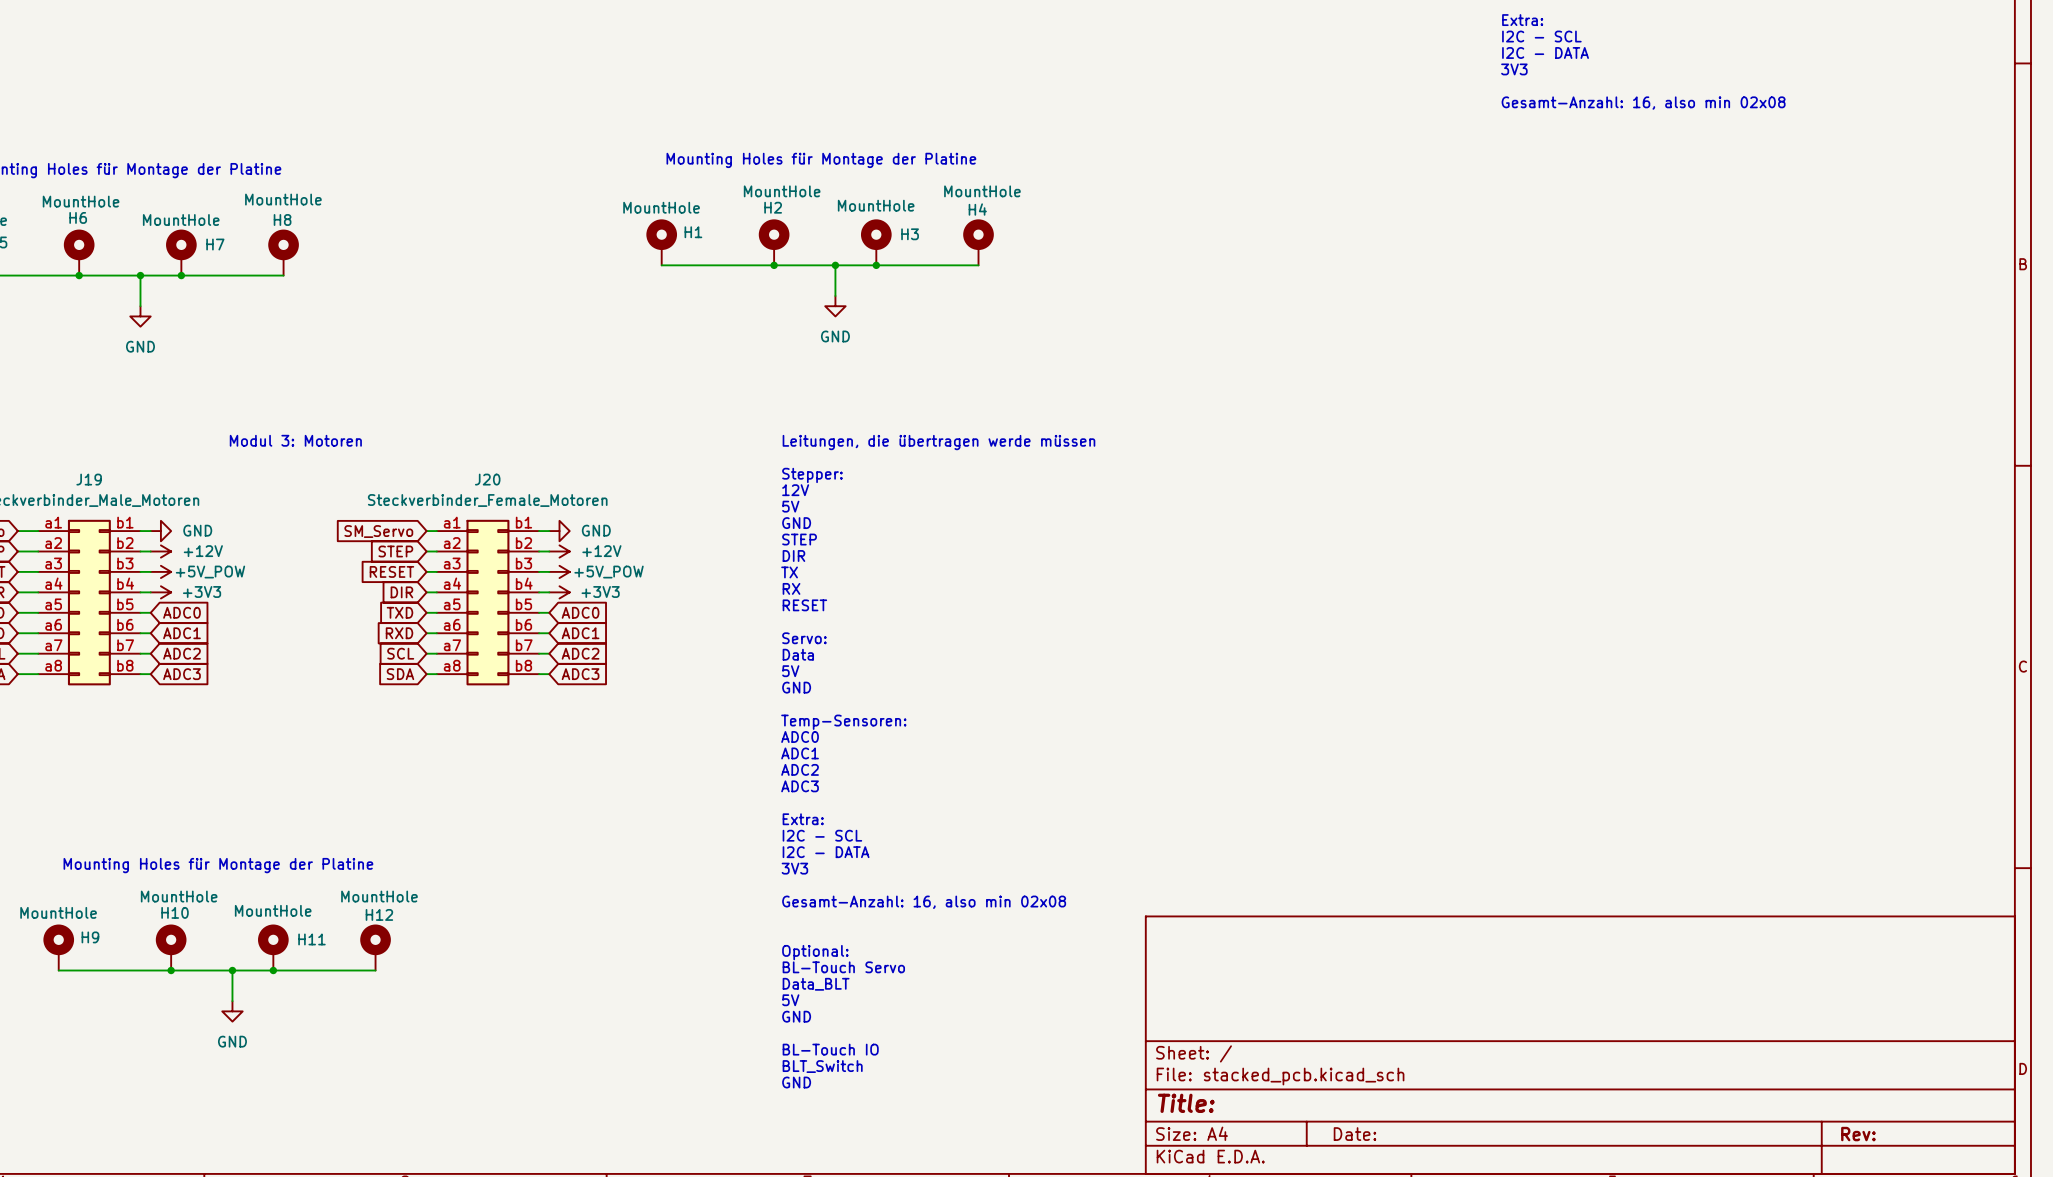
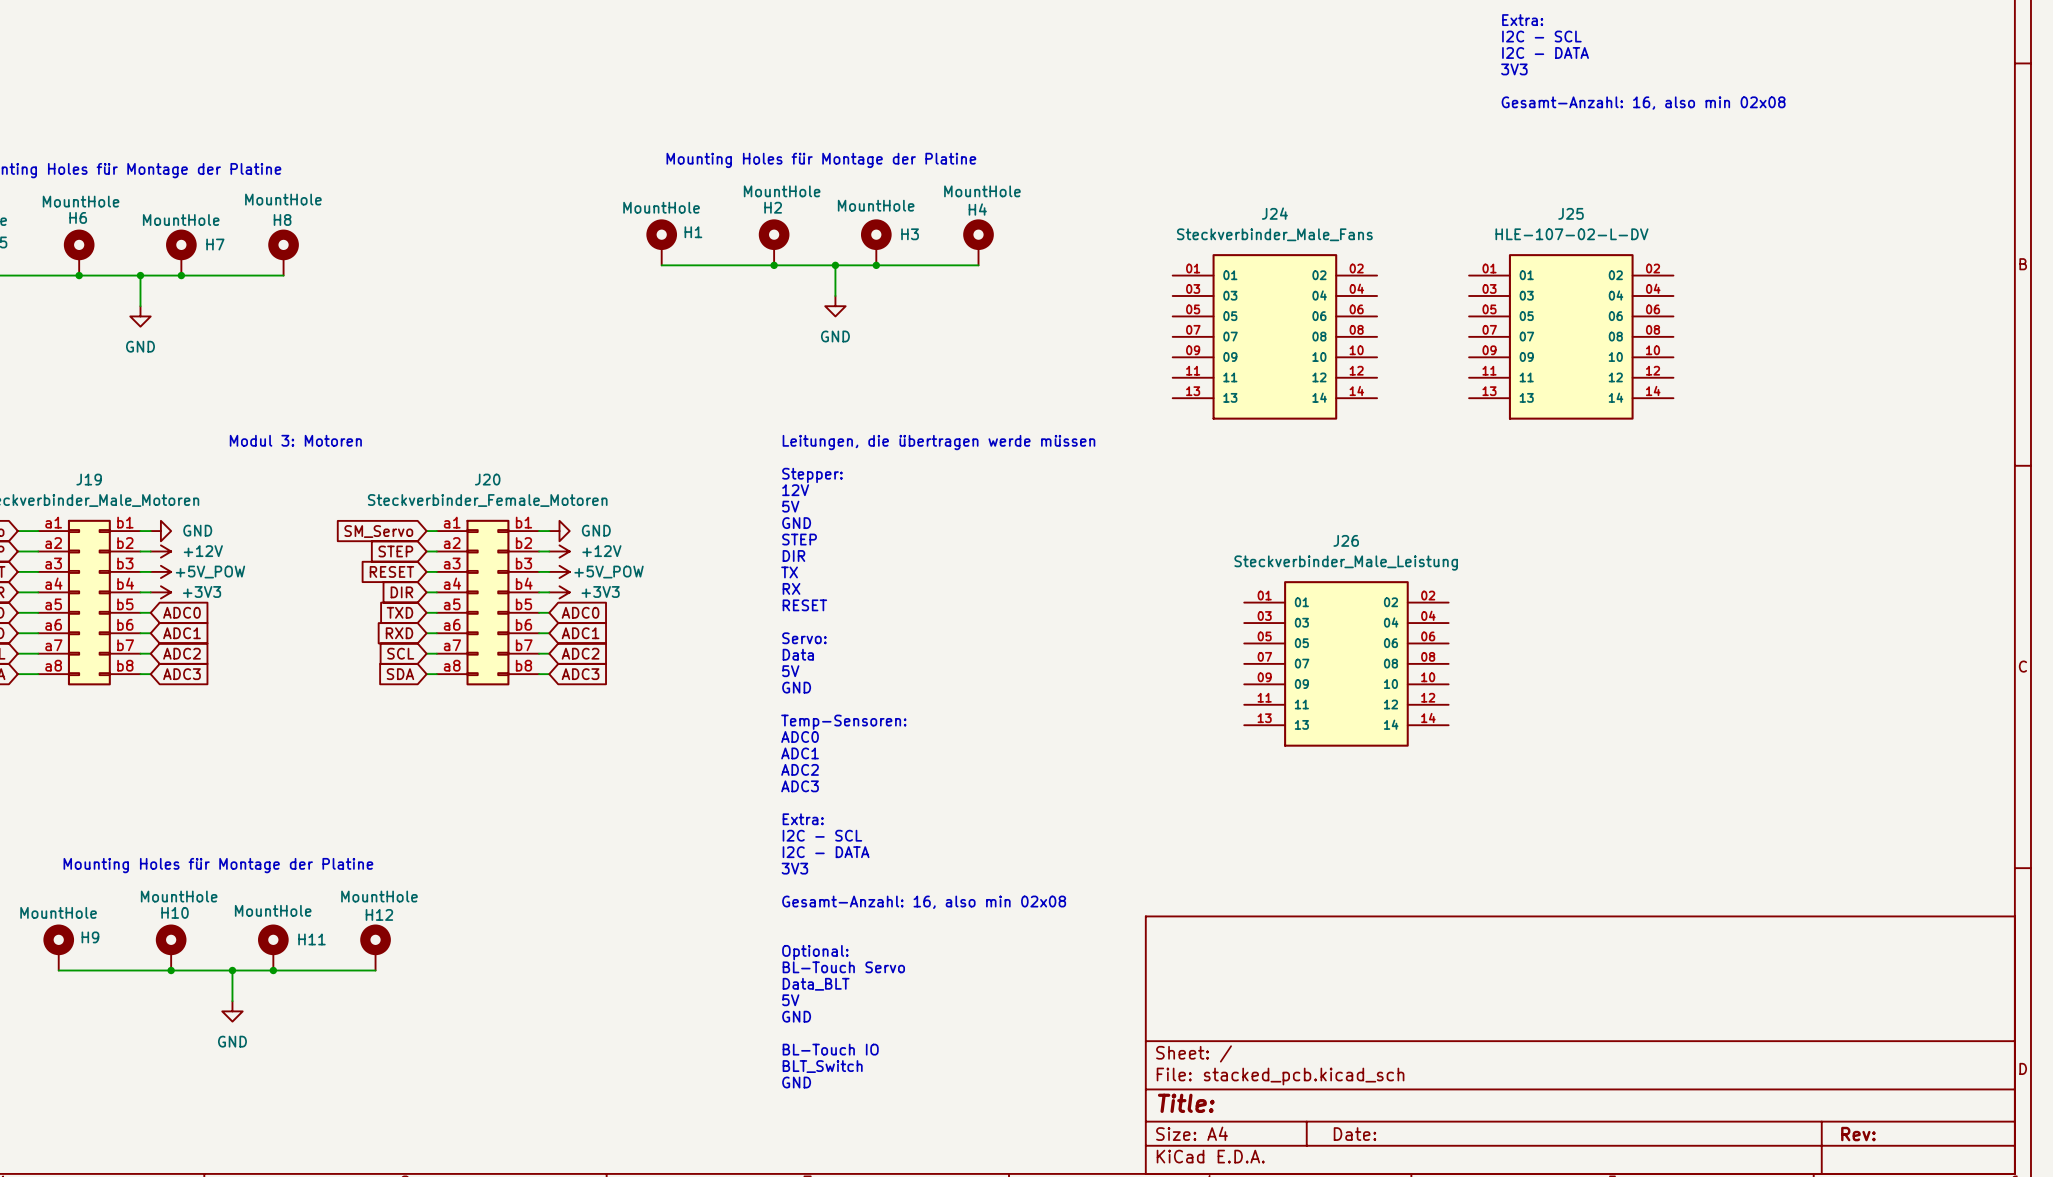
J24: none -> Steckverbinder_Male_Fans (1274, 336)
J25: none -> HLE-107-02-L-DV (1571, 336)
J26: none -> Steckverbinder_Male_Leistung (1346, 663)

